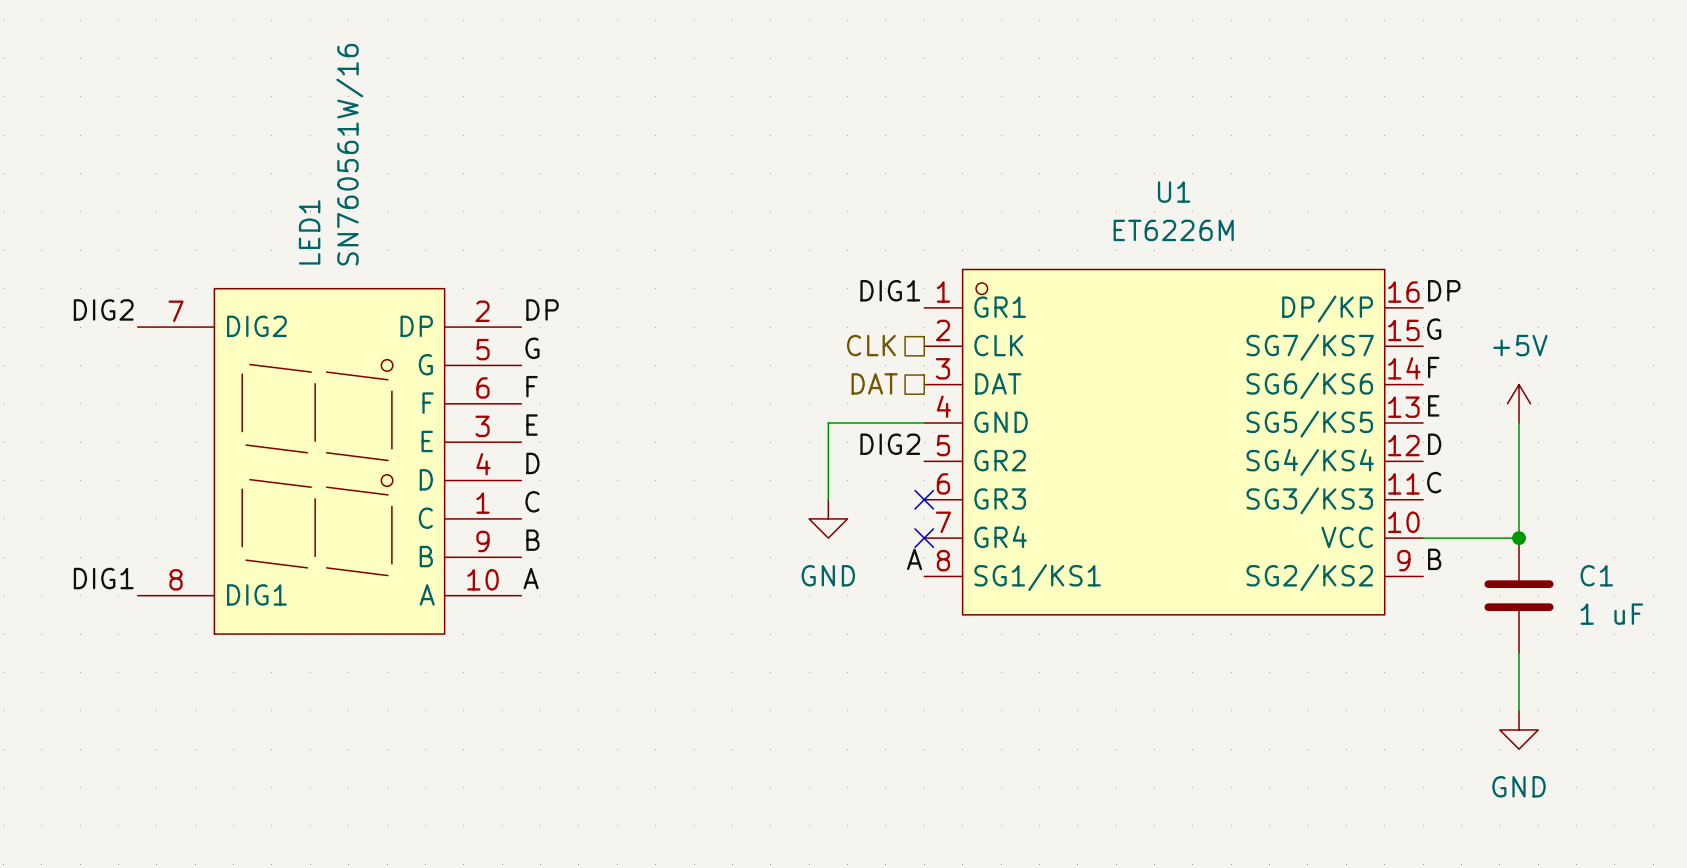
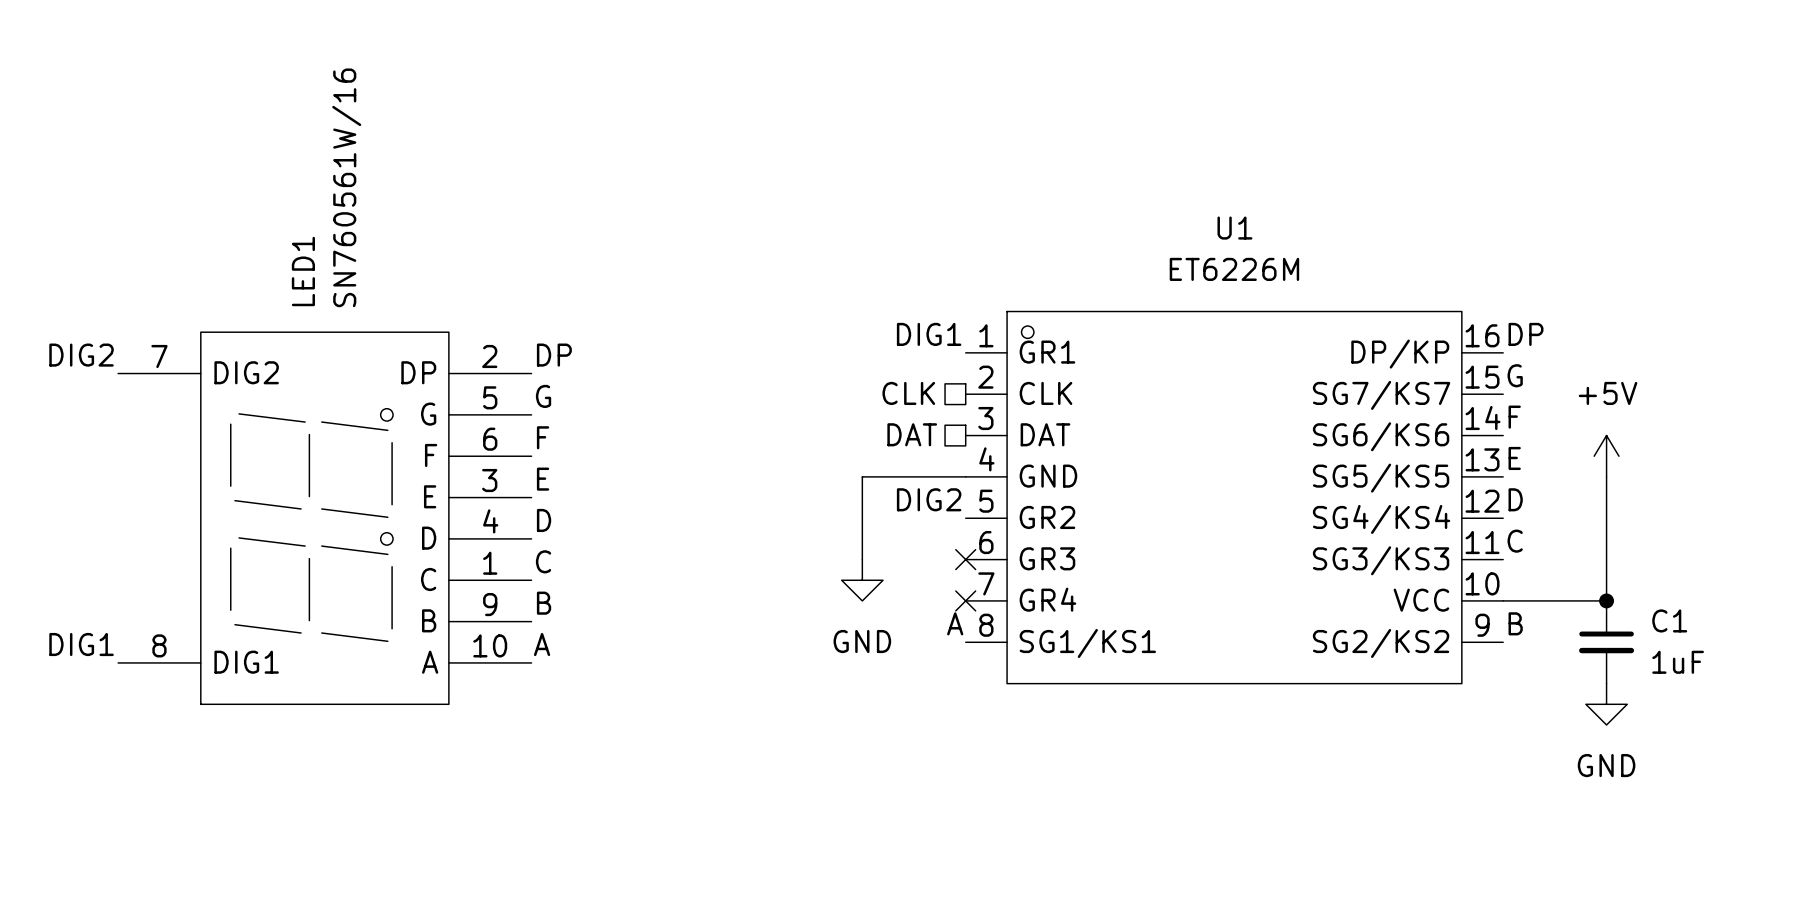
C1 symbol: [1484, 538, 1554, 654] -> [1579, 600, 1635, 684]
C1 value: 1 uF (1611, 614) -> 1uF (1678, 662)
wire: (1519, 653) (1519, 710) -> none
power symbol position: GND (1519, 729) -> GND (1606, 704)

